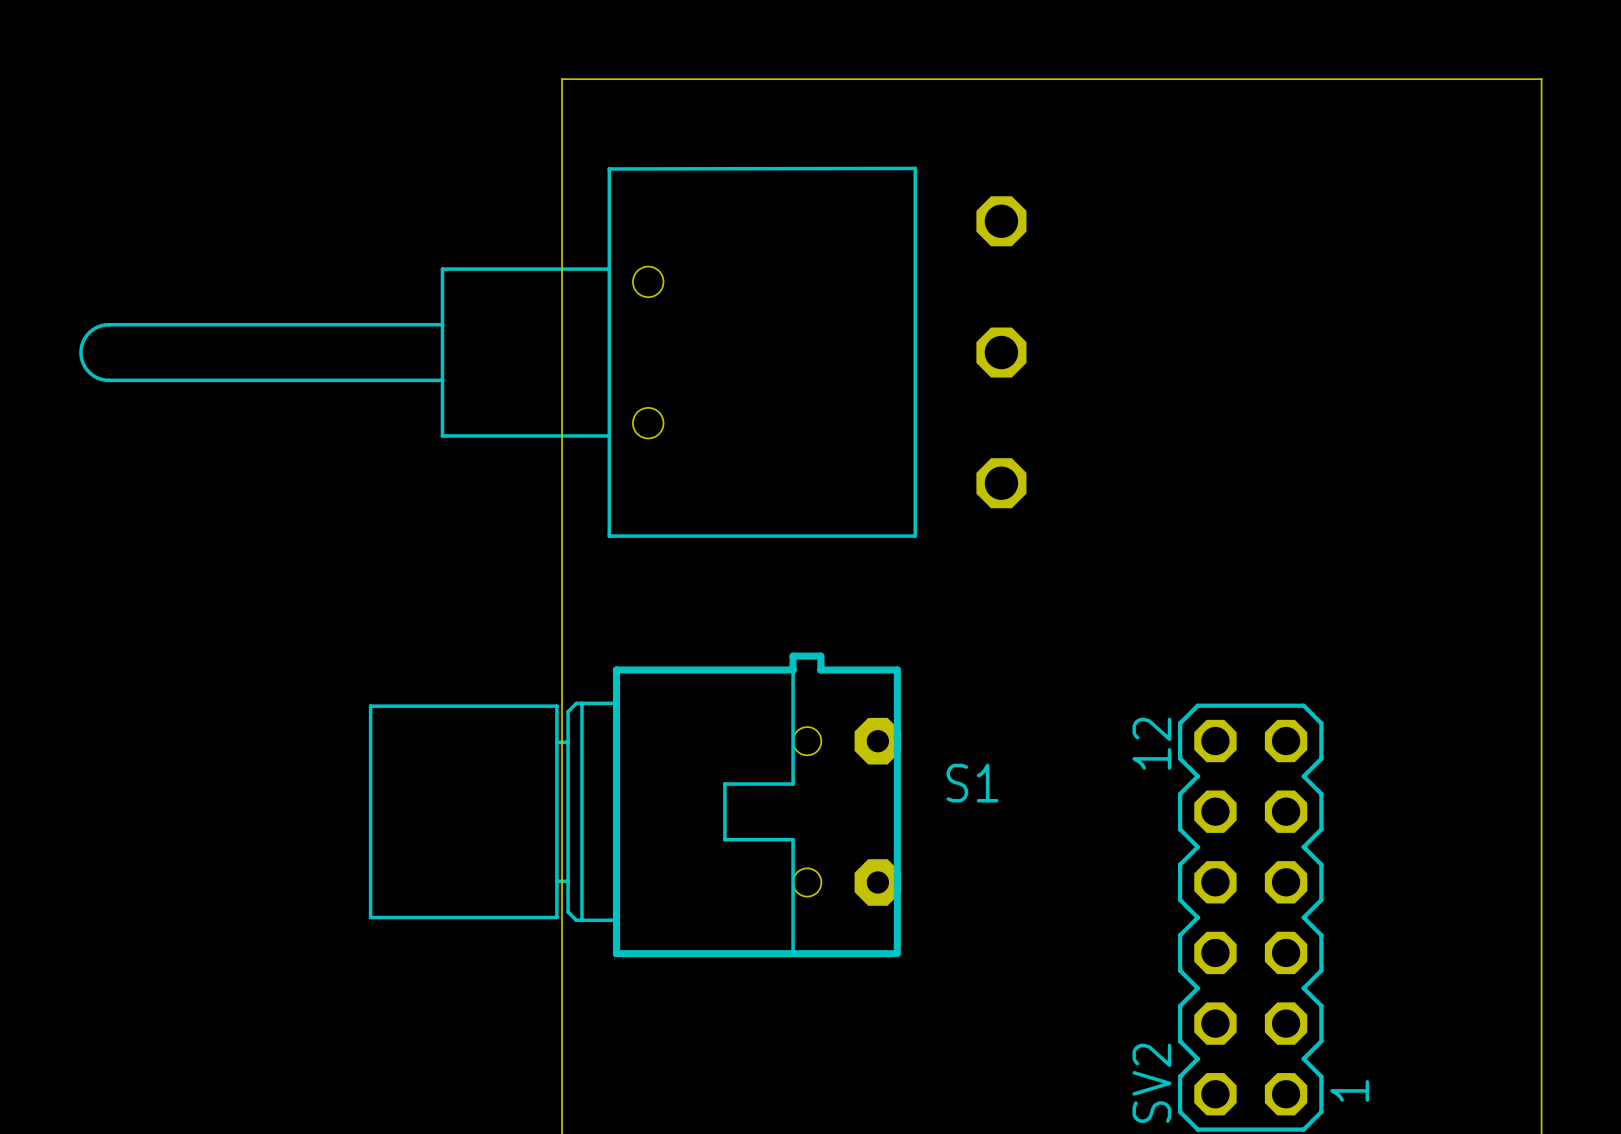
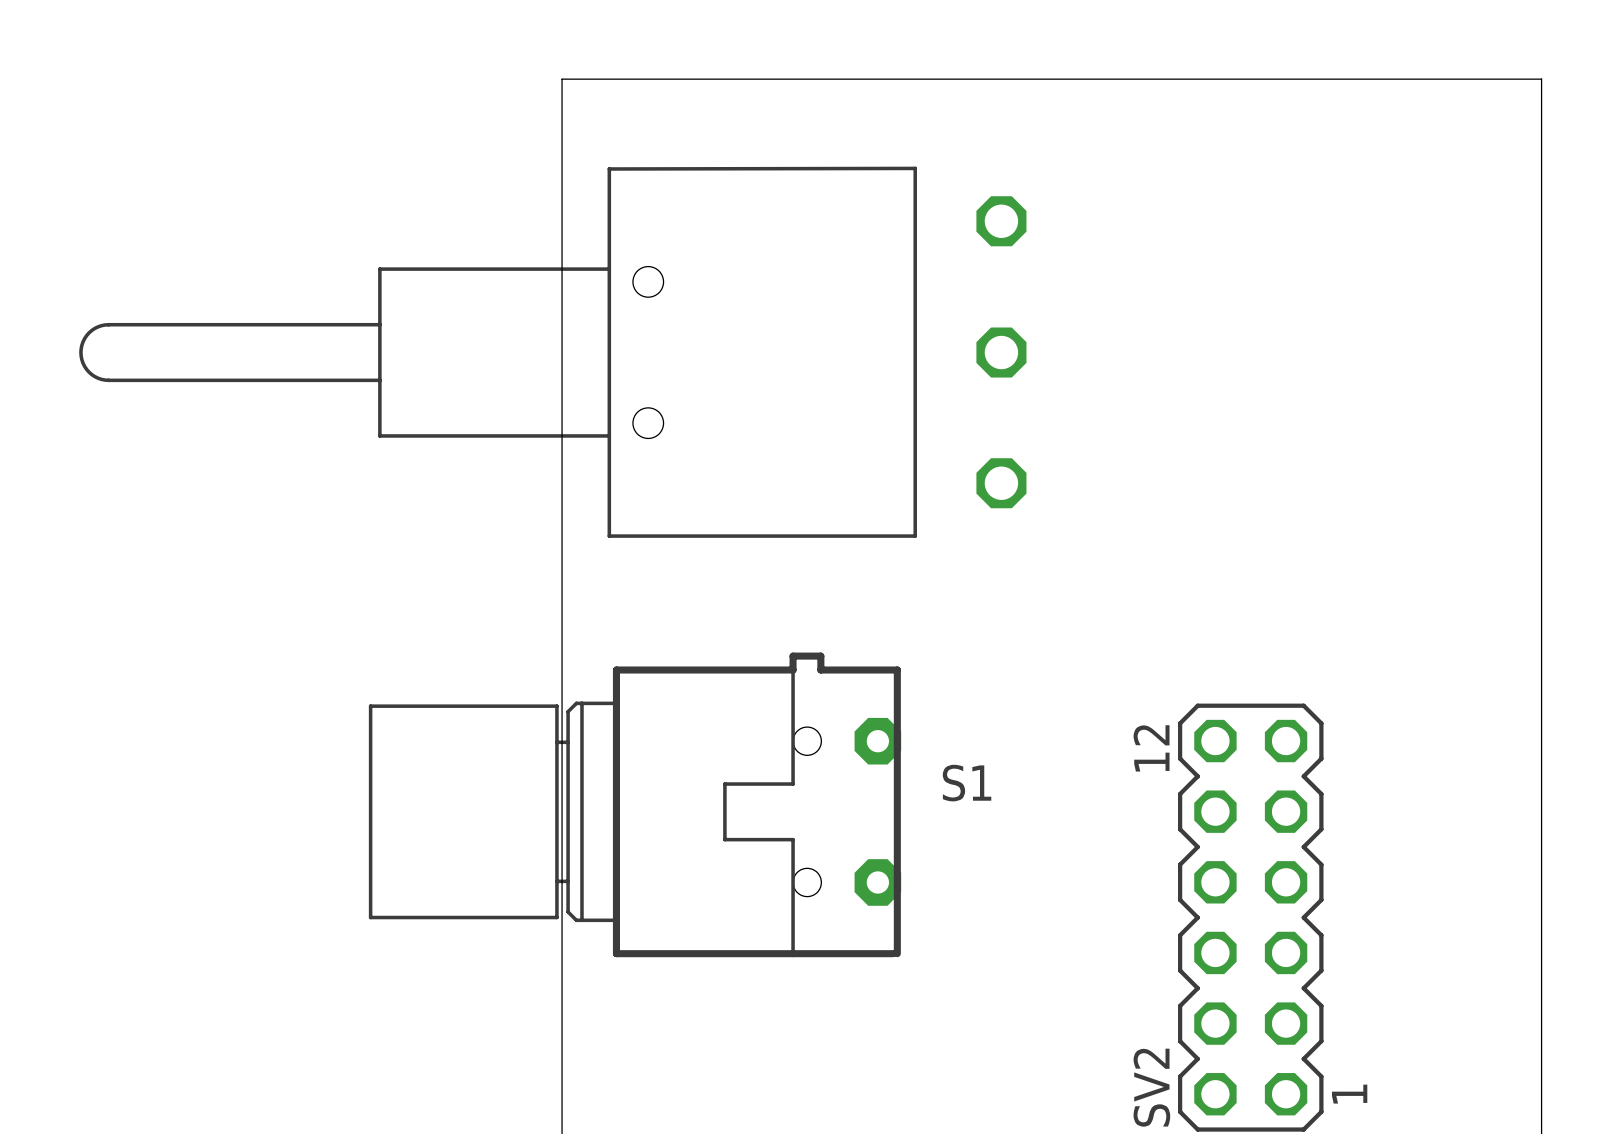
part footprint: [79, 166, 1027, 538] -> [79, 166, 1027, 538]

